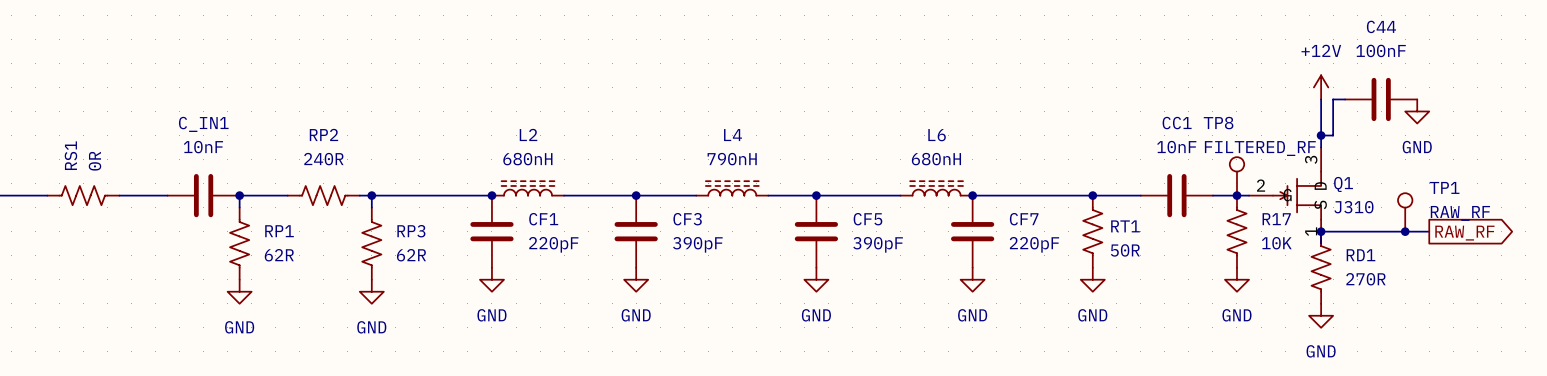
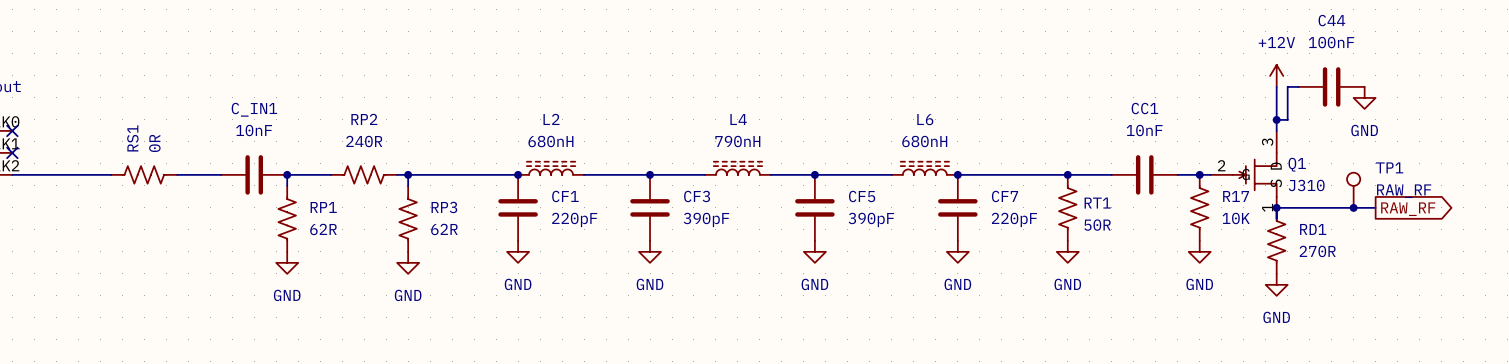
TP8: FILTERED_RF (1236, 176) -> none

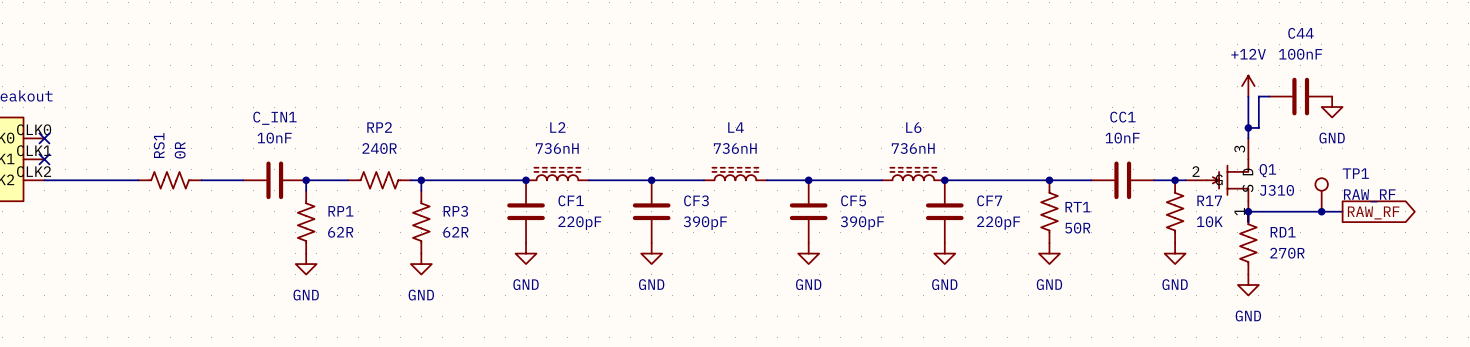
L2 value: 680nH (550, 141) -> 736nH (557, 148)
L4 value: 790nH (737, 141) -> 736nH (735, 148)
L6 value: 680nH (924, 141) -> 736nH (913, 148)

